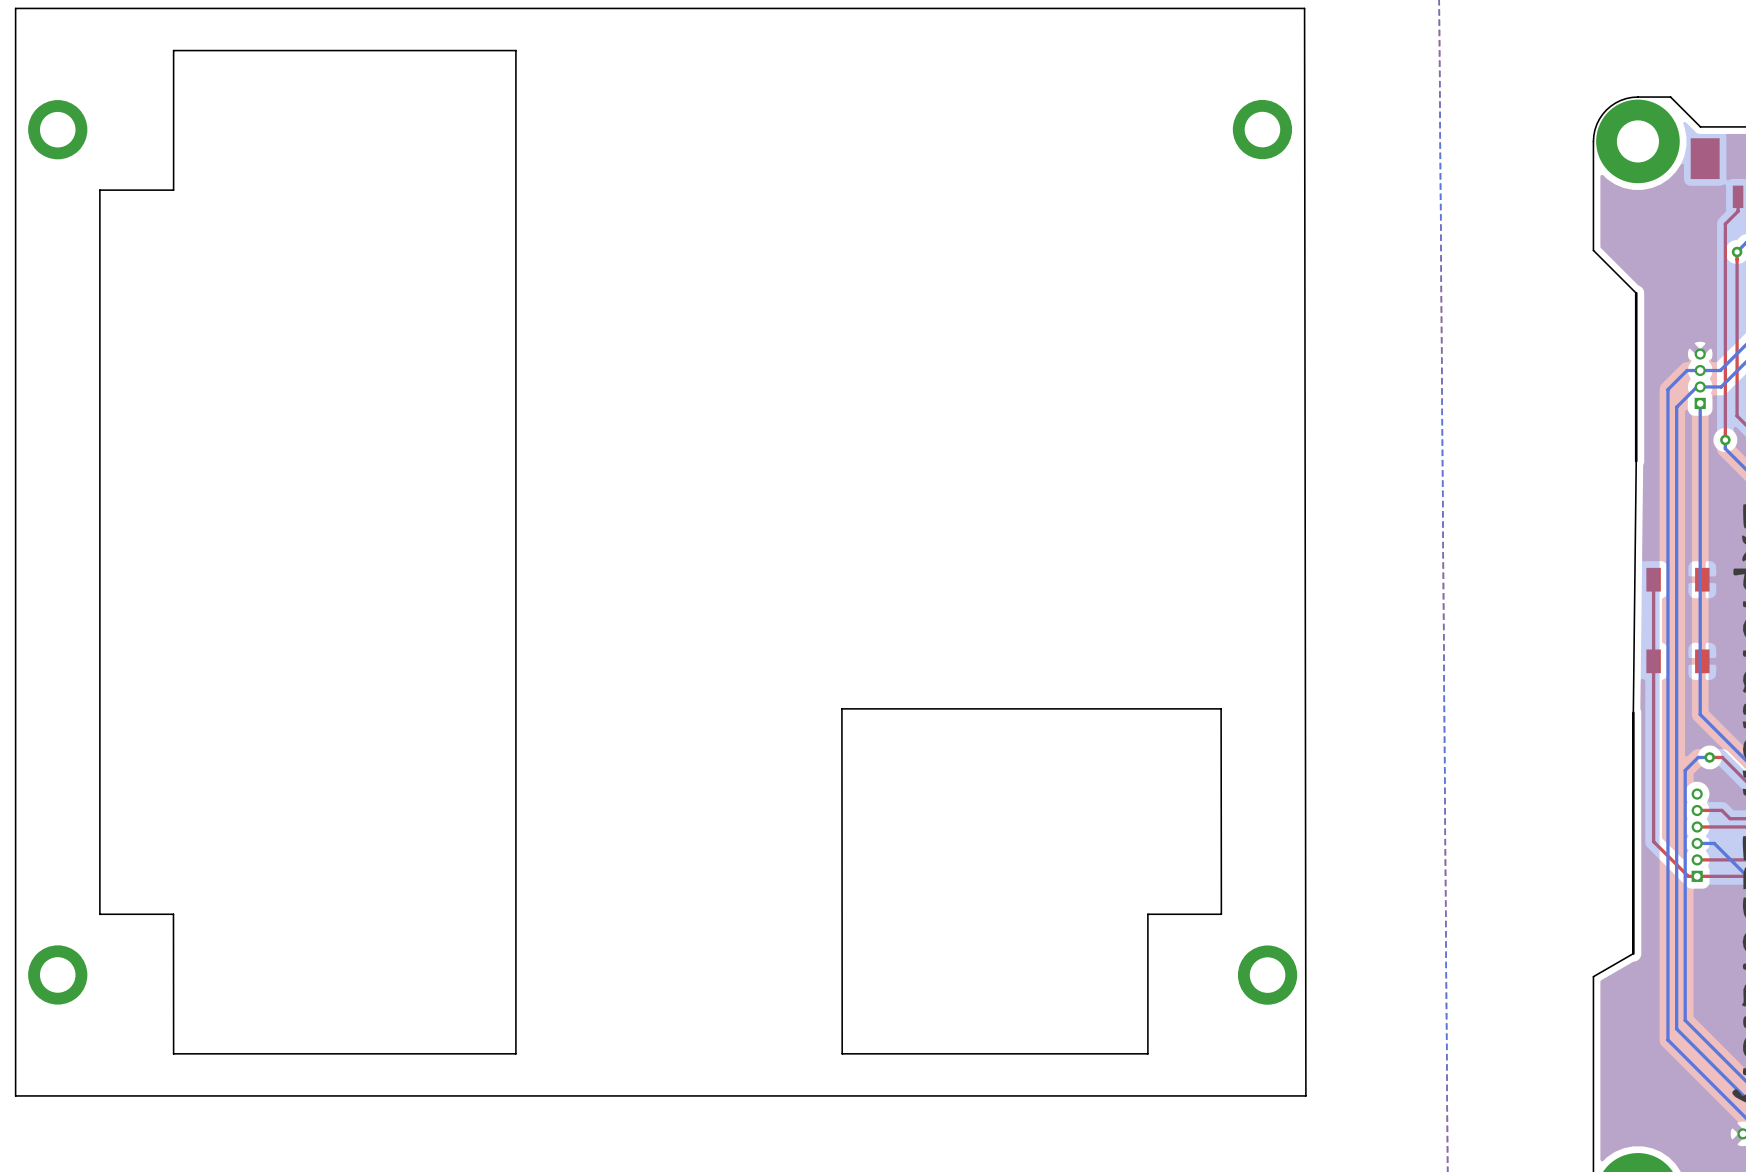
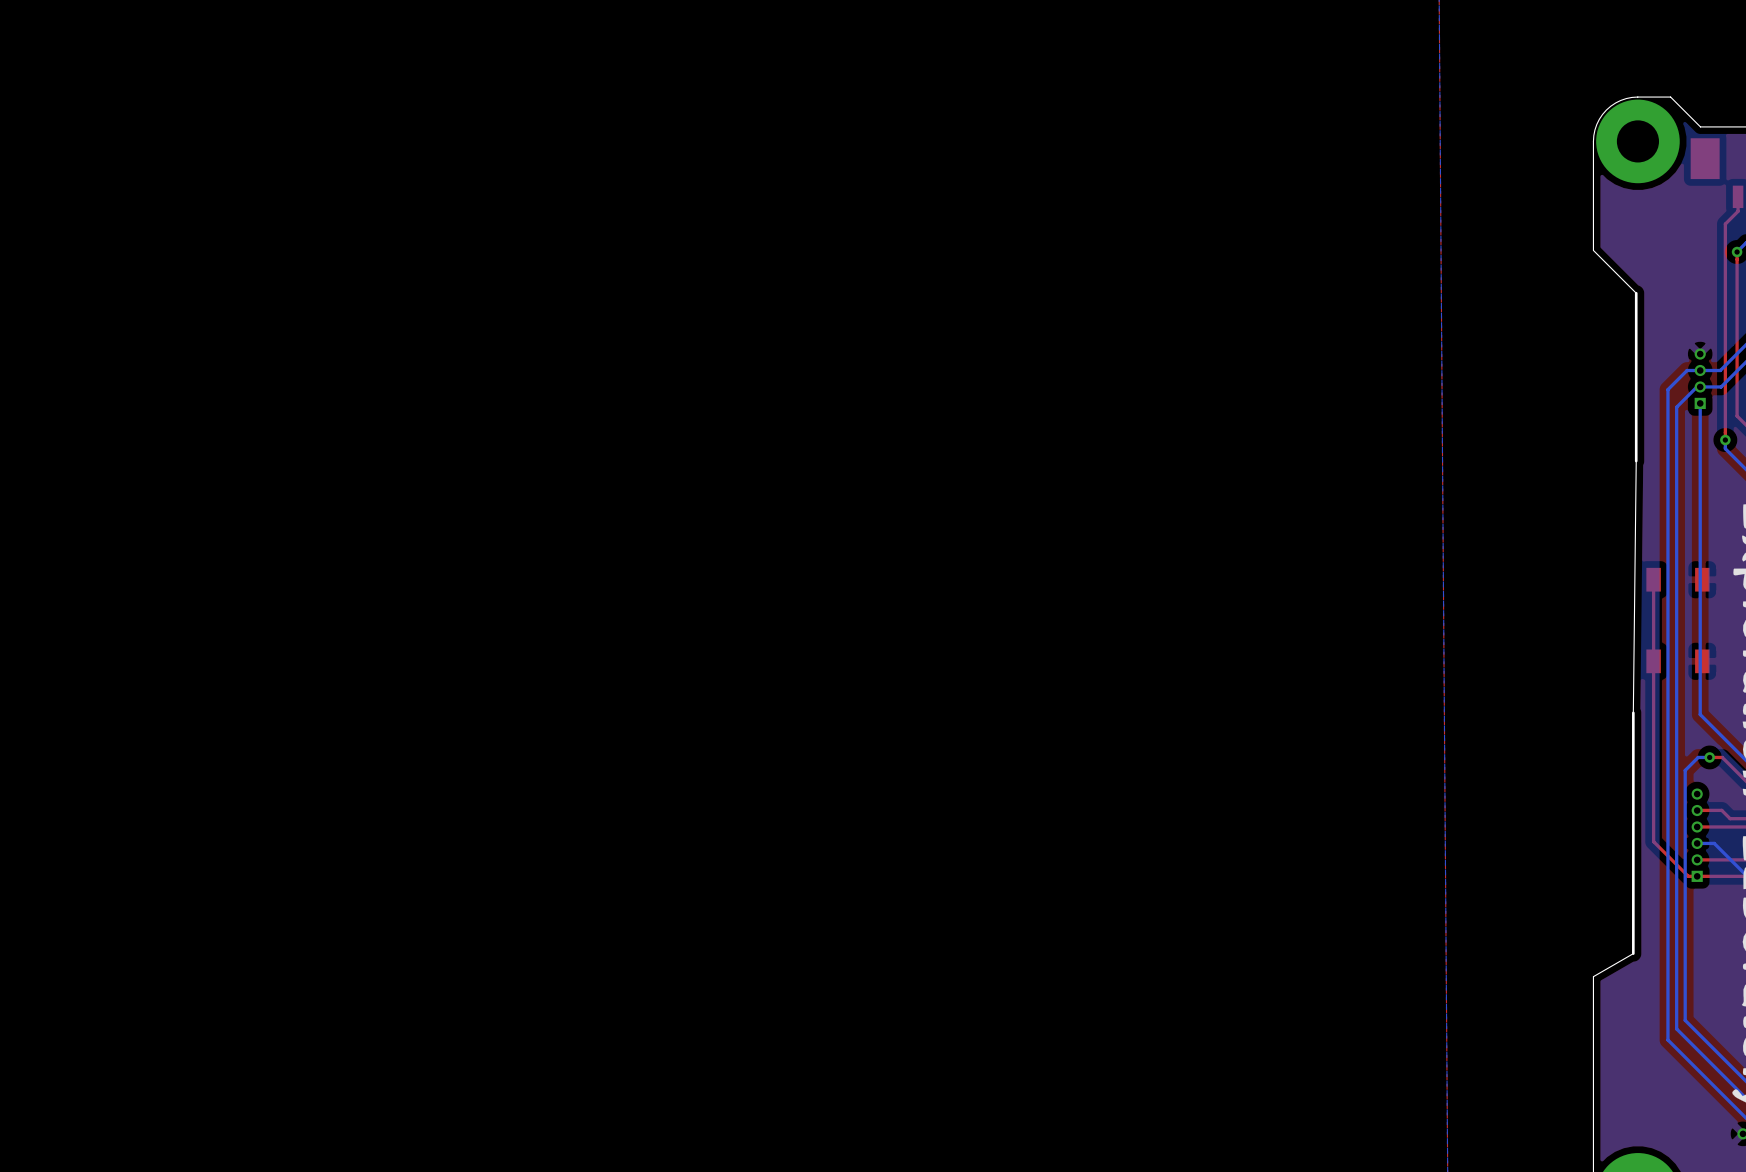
board edge: (1304, 8) (15, 8) (15, 1095) (1305, 1095) (1304, 8) -> none
board edge: (515, 50) (173, 50) (173, 190) (99, 190) (99, 914) (173, 914) (173, 1053) (515, 1053) (515, 50) -> none
part: (57, 129) -> none
part: (1262, 129) -> none
board edge: (1221, 708) (1221, 914) (1147, 914) (1147, 1053) (842, 1053) (841, 708) (1221, 708) -> none
part: (57, 974) -> none
part: (1267, 975) -> none

